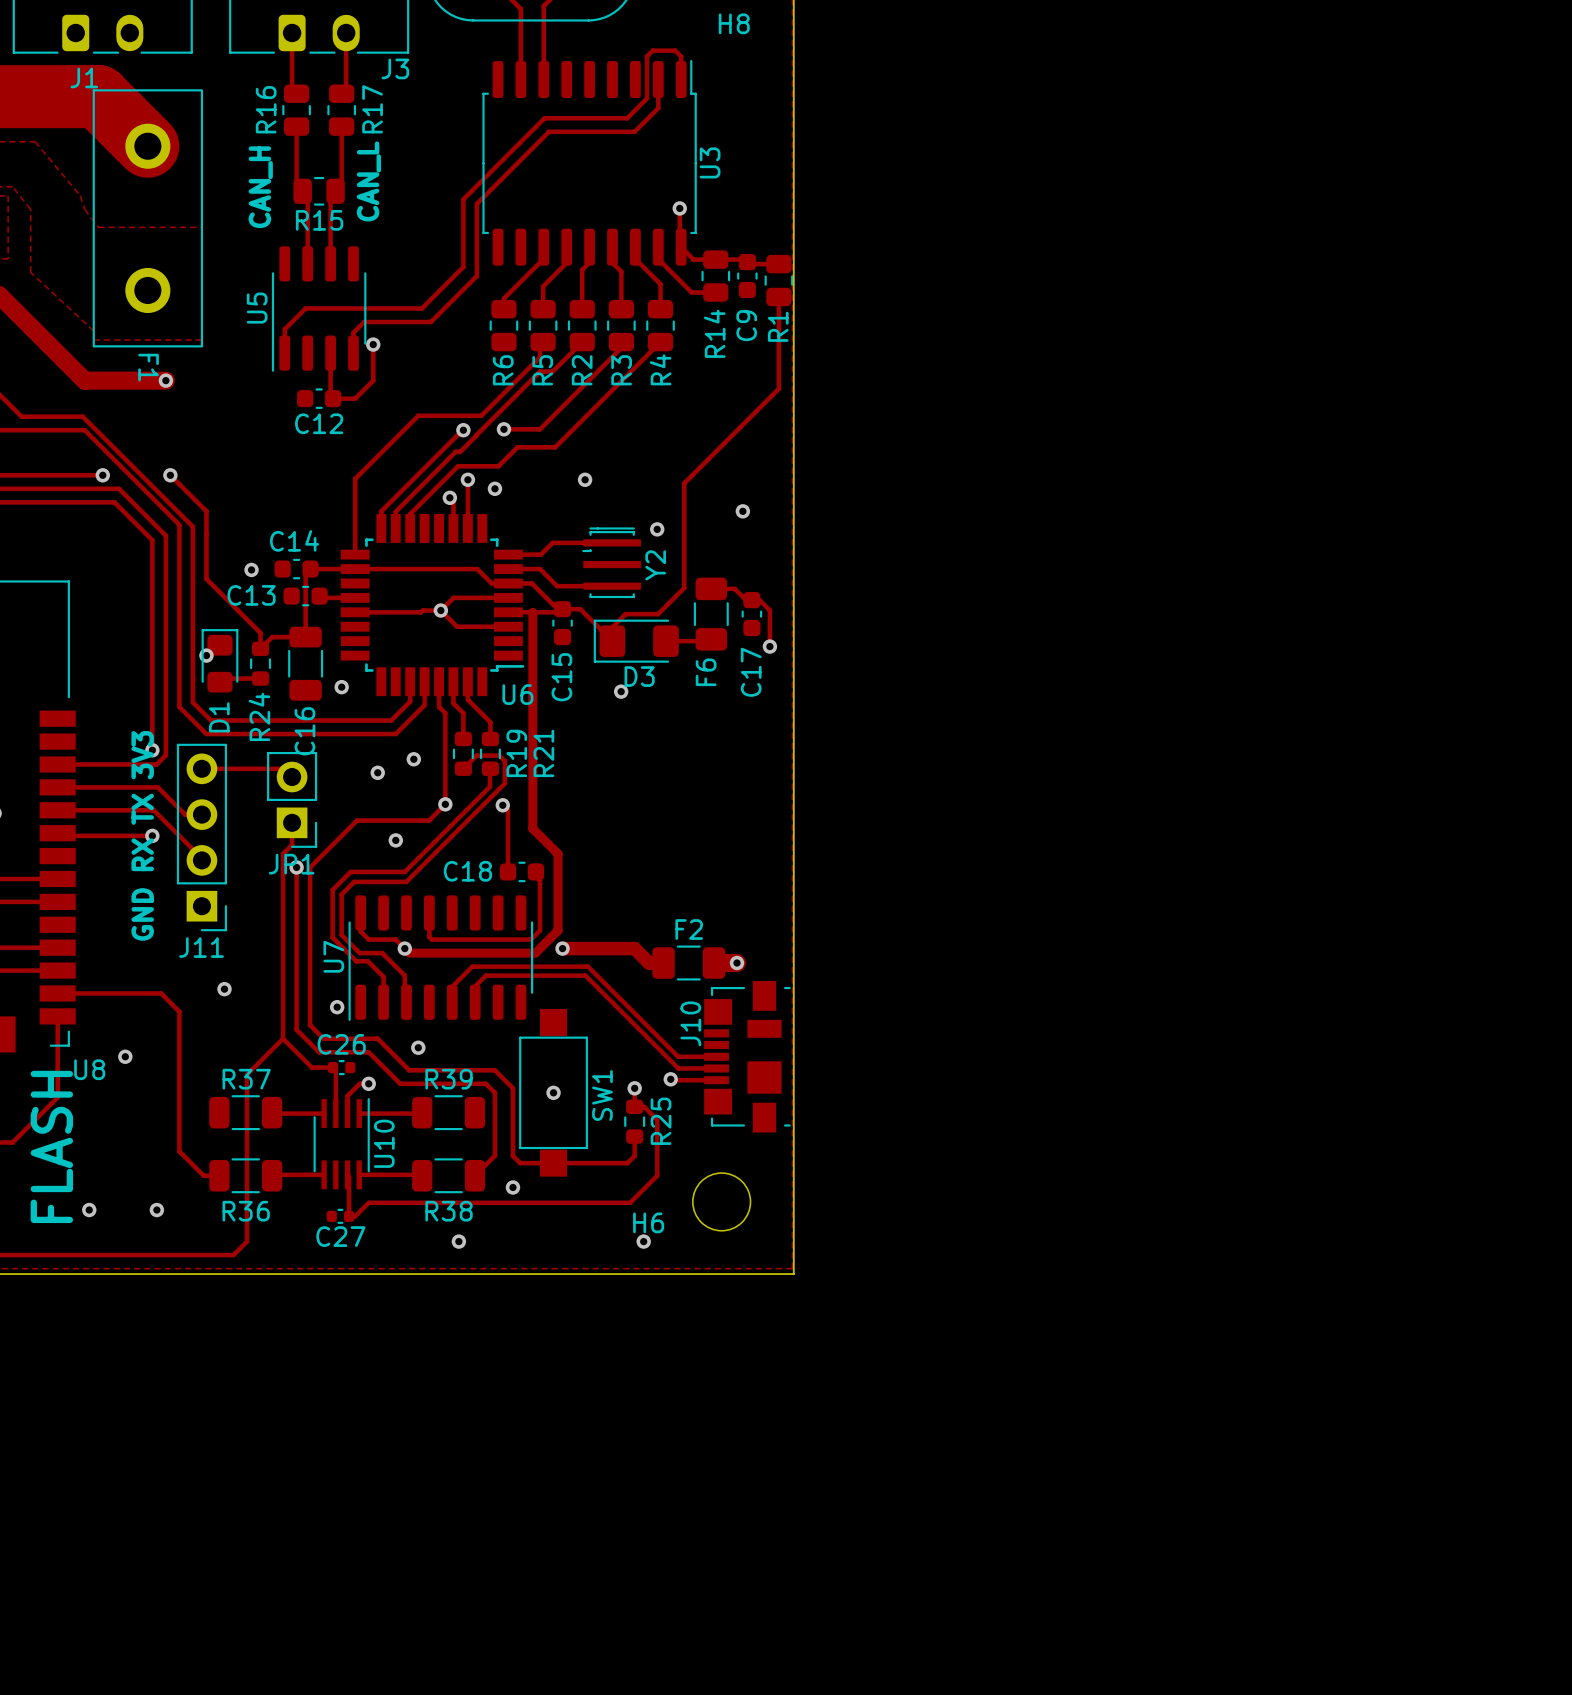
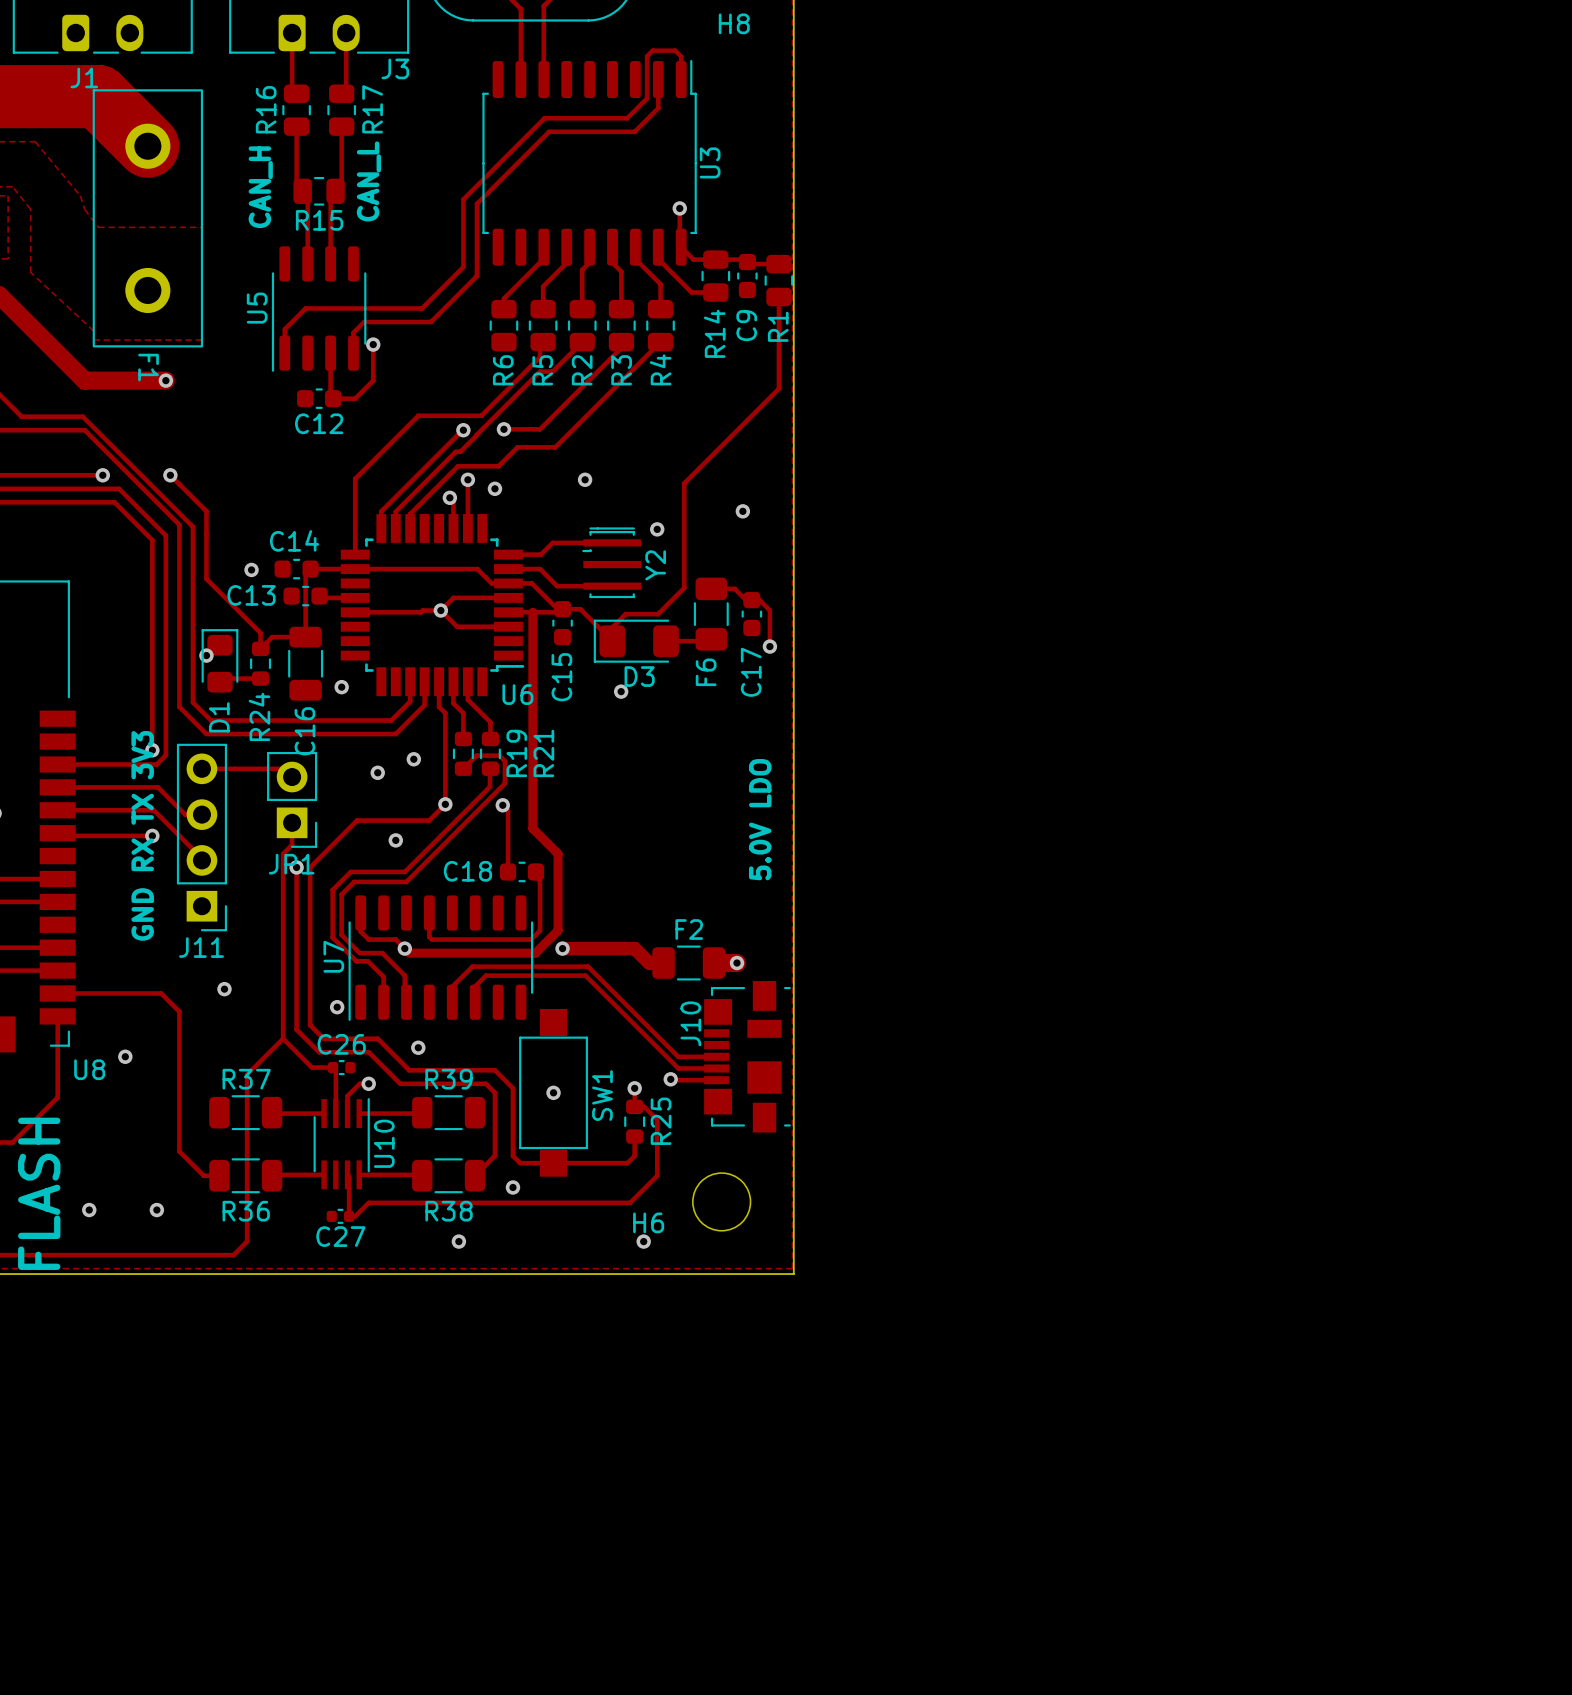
text: none -> 5.0V LDO (760, 819)
text position: FLASH (51, 1146) -> FLASH (39, 1193)

